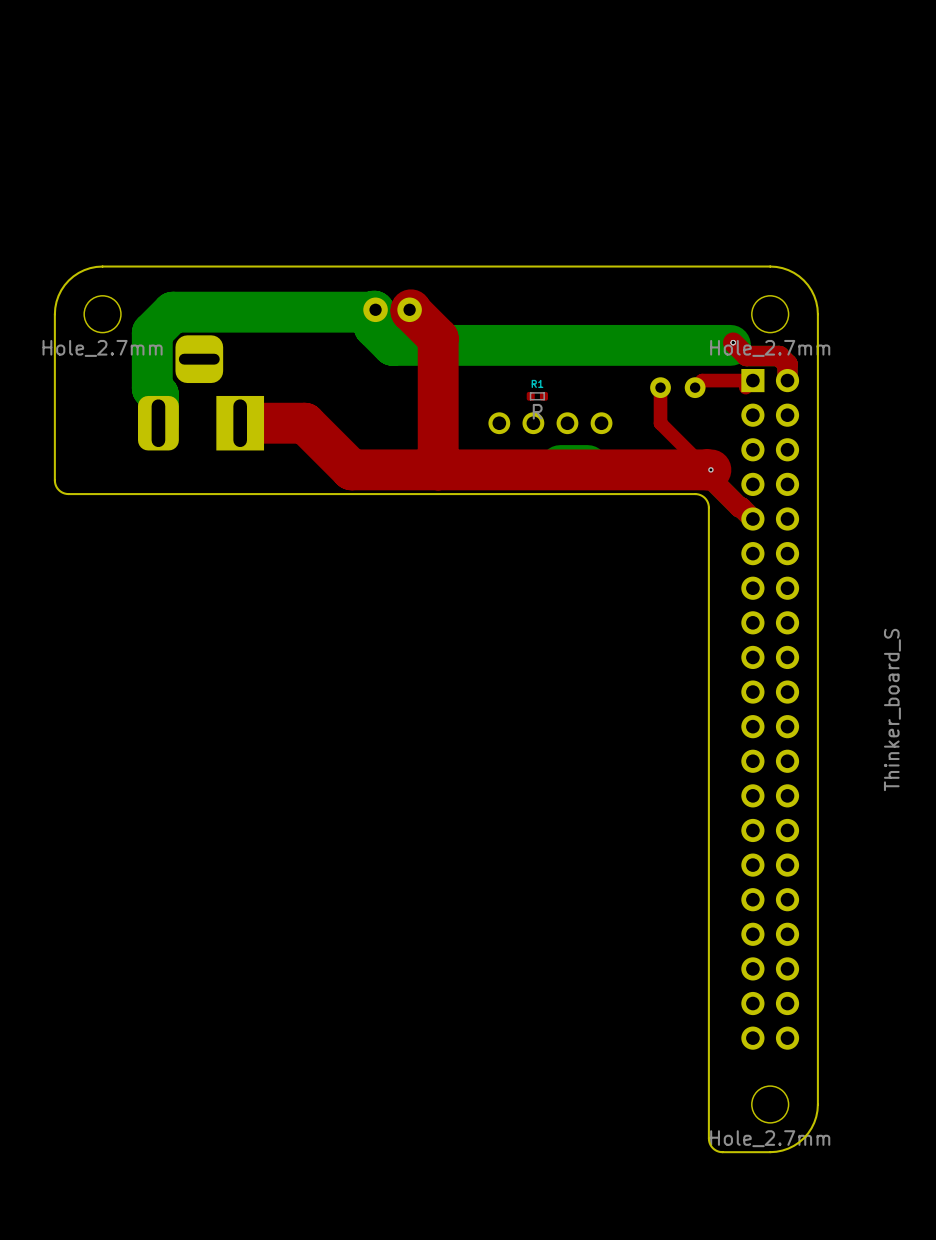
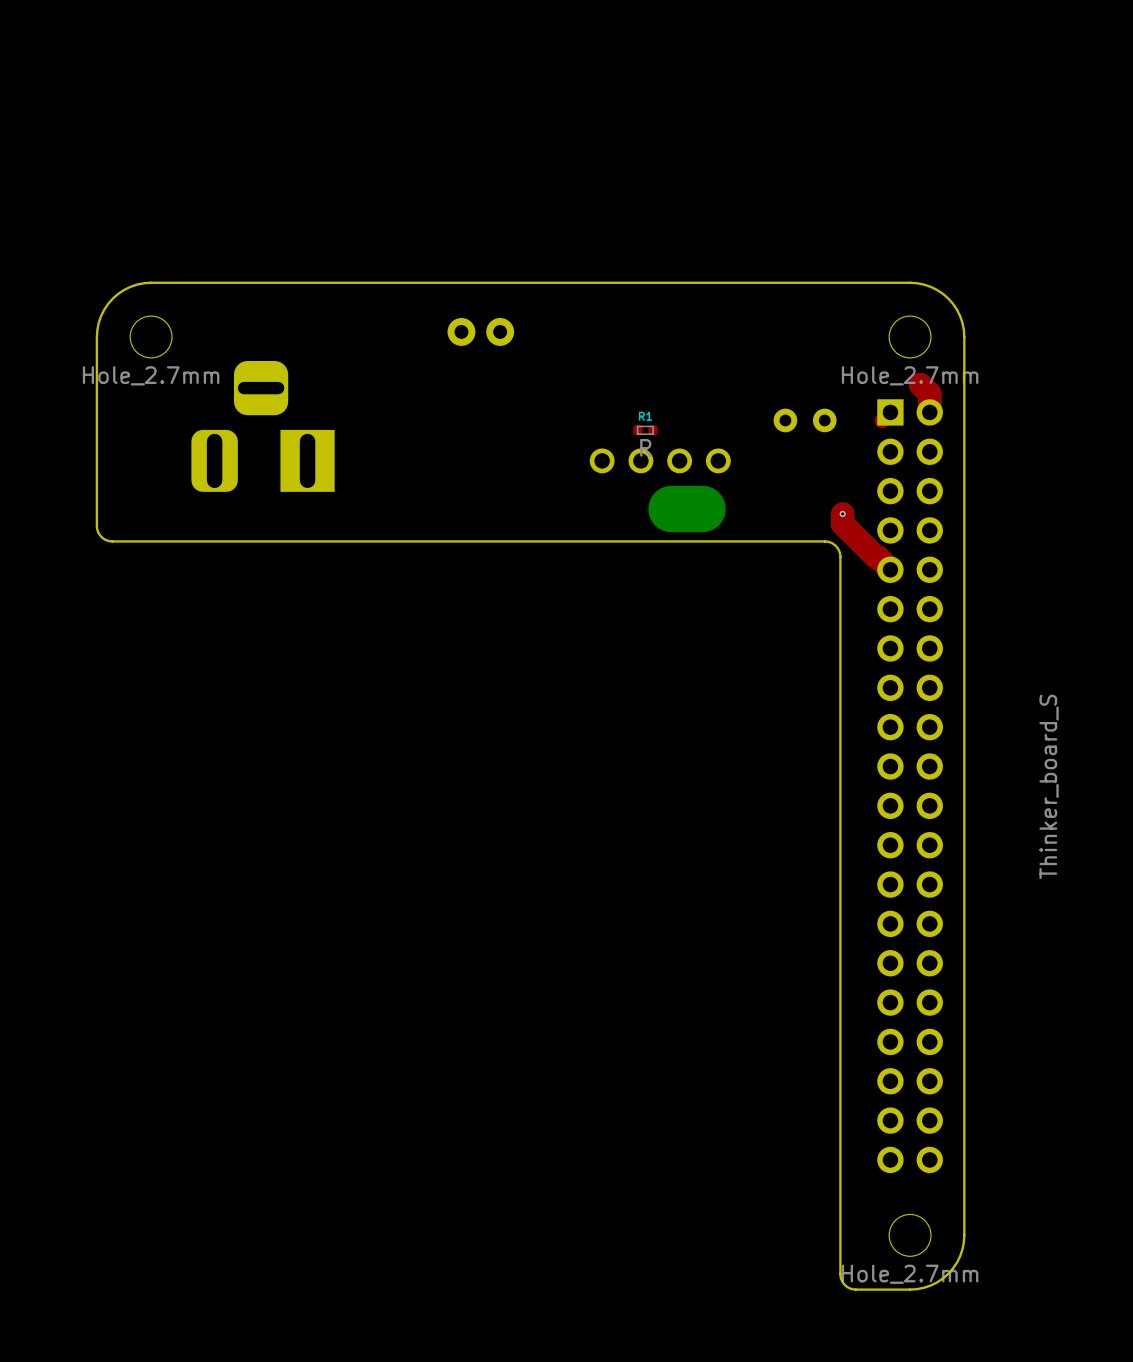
top track: (410, 309) (438, 338) (438, 469) -> none
top track: (733, 342) (746, 356) (779, 356) -> none
via: (733, 342) -> none
bottom track: (730, 345) (392, 345) (374, 326) (374, 311) (172, 312) (152, 332) (152, 388) (158, 394) (158, 423) -> none
top track: (752, 380) (702, 380) (695, 387) -> none
top track: (660, 387) (660, 423) (707, 469) -> none
top track: (240, 423) (304, 423) (351, 469) (710, 469) -> none

